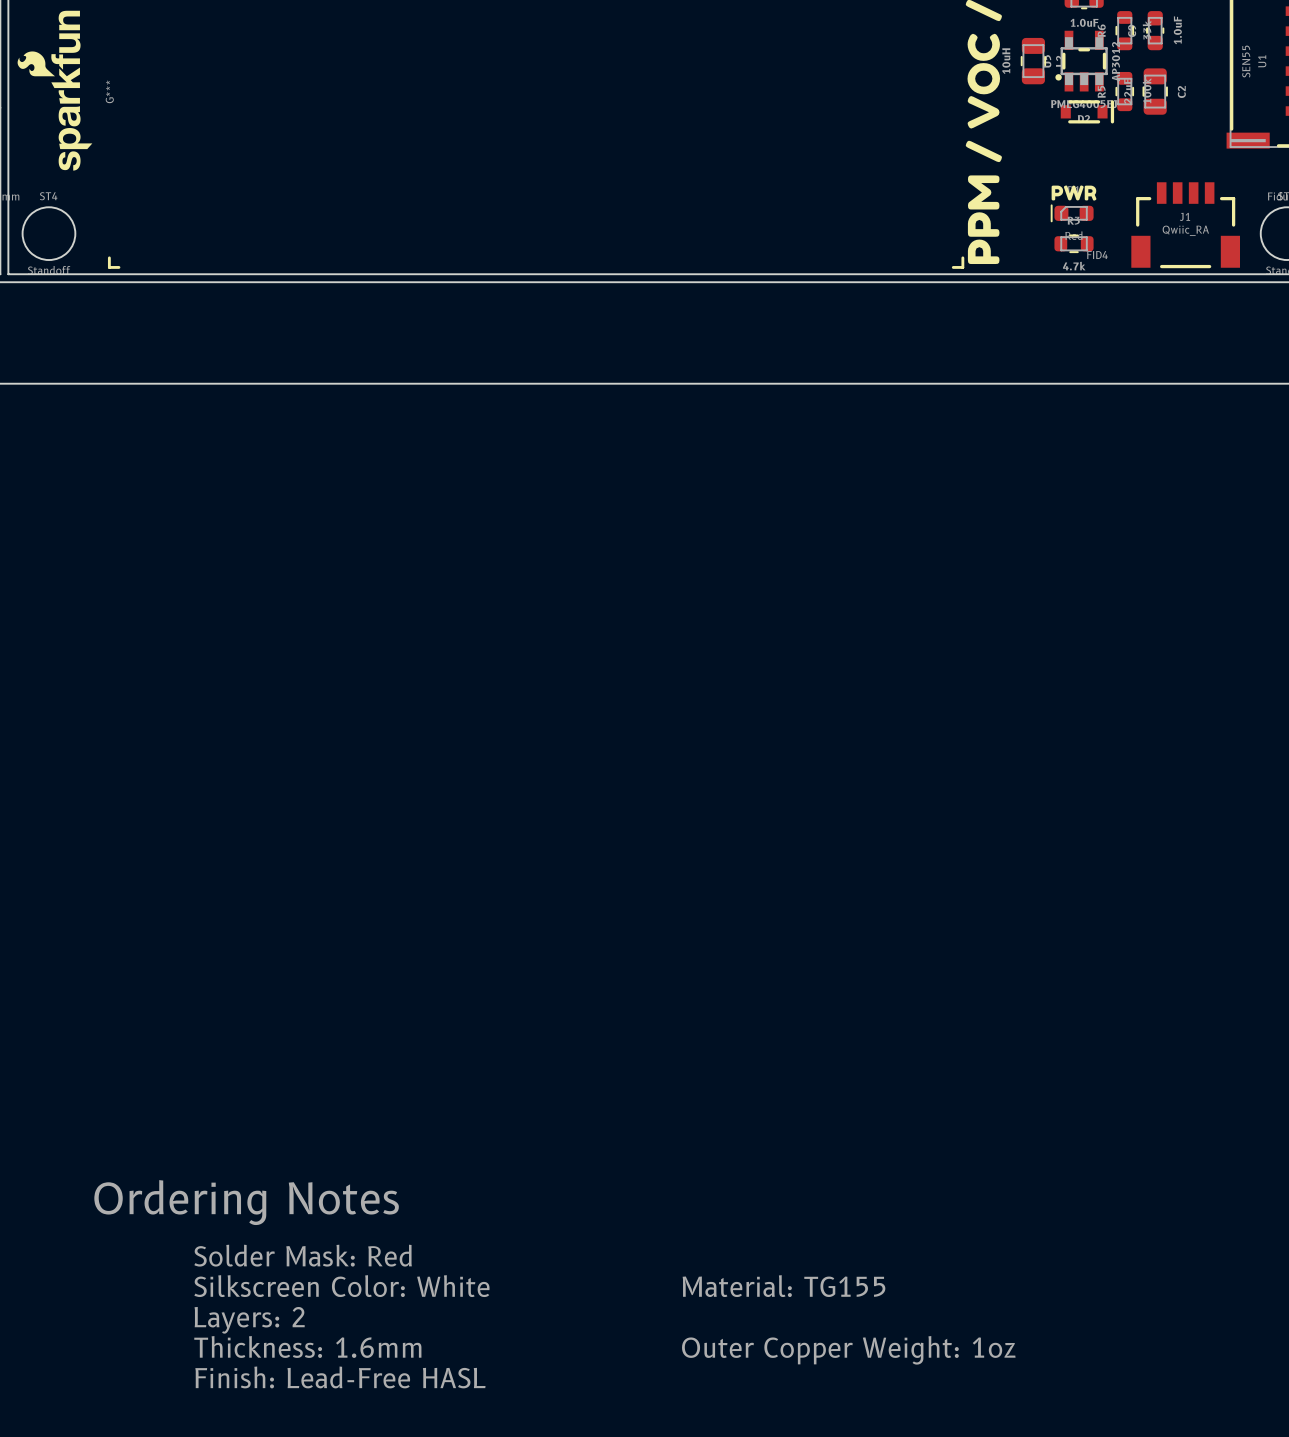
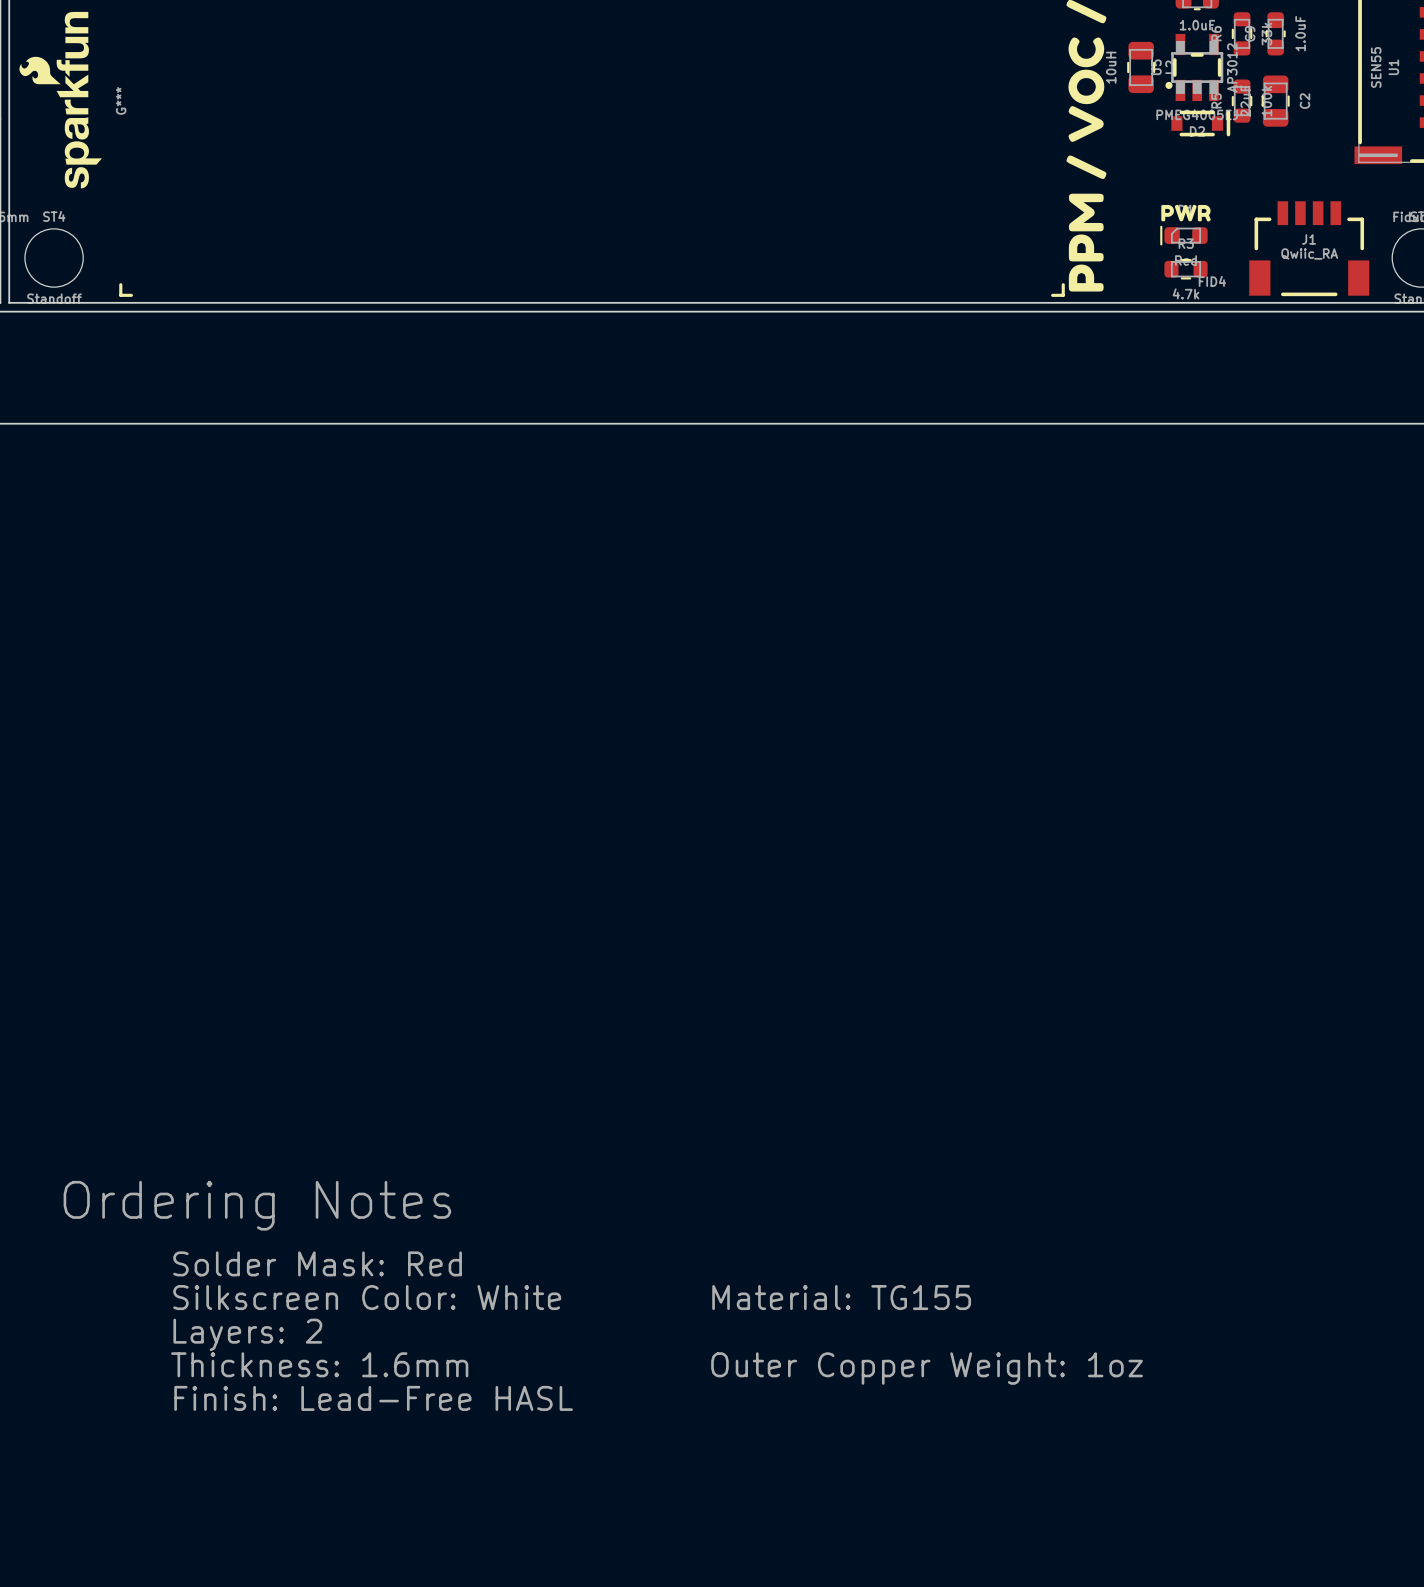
text position: Ordering Notes (246, 1202) -> Ordering Notes (257, 1205)
text position: Solder Mask: Red (303, 1255) -> Solder Mask: Red (317, 1263)
text position: Silkscreen Color: White (341, 1286) -> Silkscreen Color: White (367, 1297)
text position: Material: TG155 (783, 1286) -> Material: TG155 (841, 1297)
text position: Layers: 2 (249, 1320) -> Layers: 2 (247, 1334)
text position: Thickness: 1.6mm (307, 1346) -> Thickness: 1.6mm (319, 1364)
text position: Outer Copper Weight: 1oz (848, 1350) -> Outer Copper Weight: 1oz (927, 1368)
text position: Finish: Lead-Free HASL (340, 1377) -> Finish: Lead-Free HASL (373, 1398)

